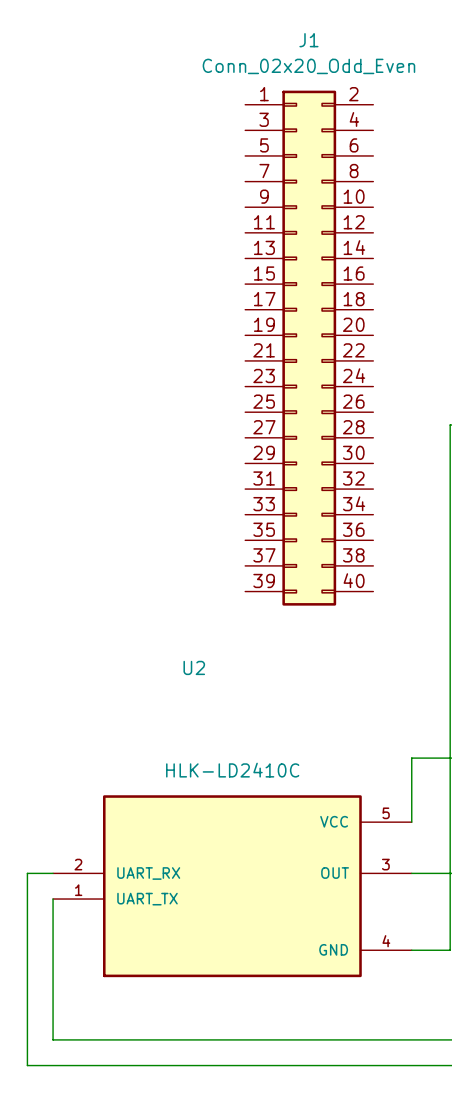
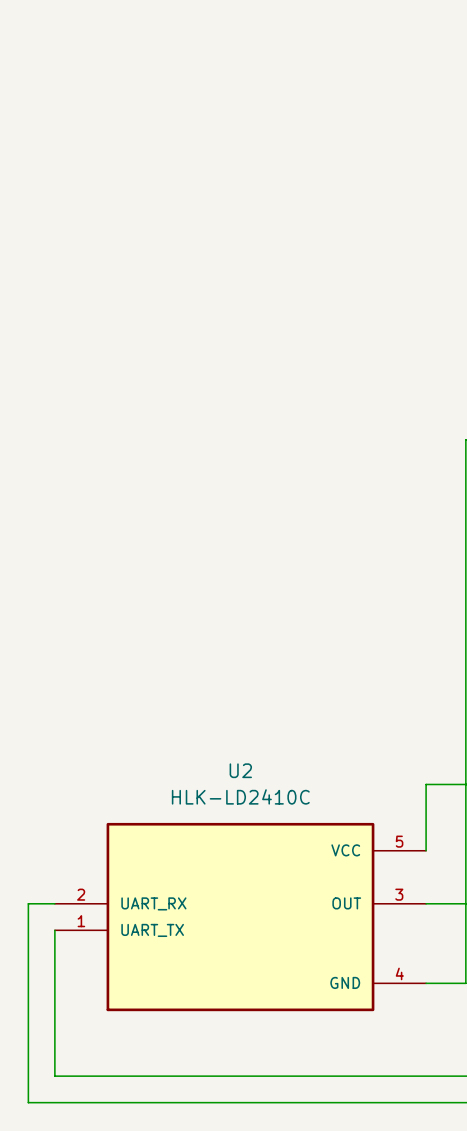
J1: Conn_02x20_Odd_Even (309, 348) -> none
U2 name position: U2 (194, 667) -> U2 (240, 770)

